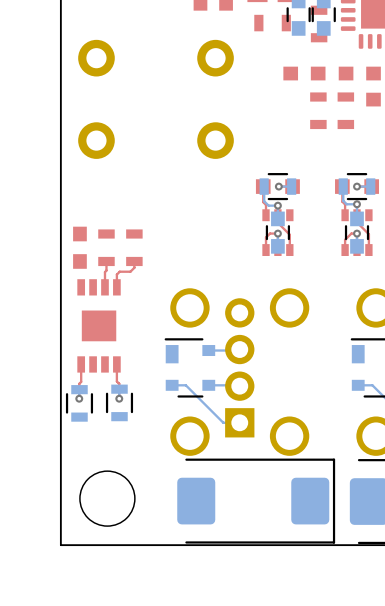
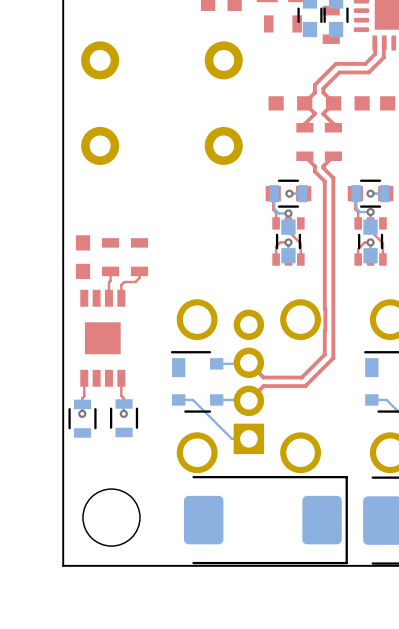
top track: none -> (374, 43) (375, 54) (365, 63) (335, 63) (314, 84) (314, 92) (304, 102) (314, 113) (304, 123) (304, 127)
top track: none -> (384, 43) (383, 57) (368, 72) (339, 72) (323, 88) (323, 92) (333, 102) (323, 113) (333, 123) (333, 127)
part: (304, 73) -> none
part: (359, 73) -> none
part: none -> (290, 103)
part: none -> (347, 103)
part: (318, 110) -> none
part: (345, 110) -> none
part: none -> (304, 141)
part: none -> (333, 141)
top track: none -> (304, 156) (314, 166) (314, 171) (324, 181) (324, 354) (301, 377) (263, 377) (248, 362)
top track: none -> (333, 156) (323, 166) (333, 177) (333, 358) (305, 386) (263, 386) (248, 400)

